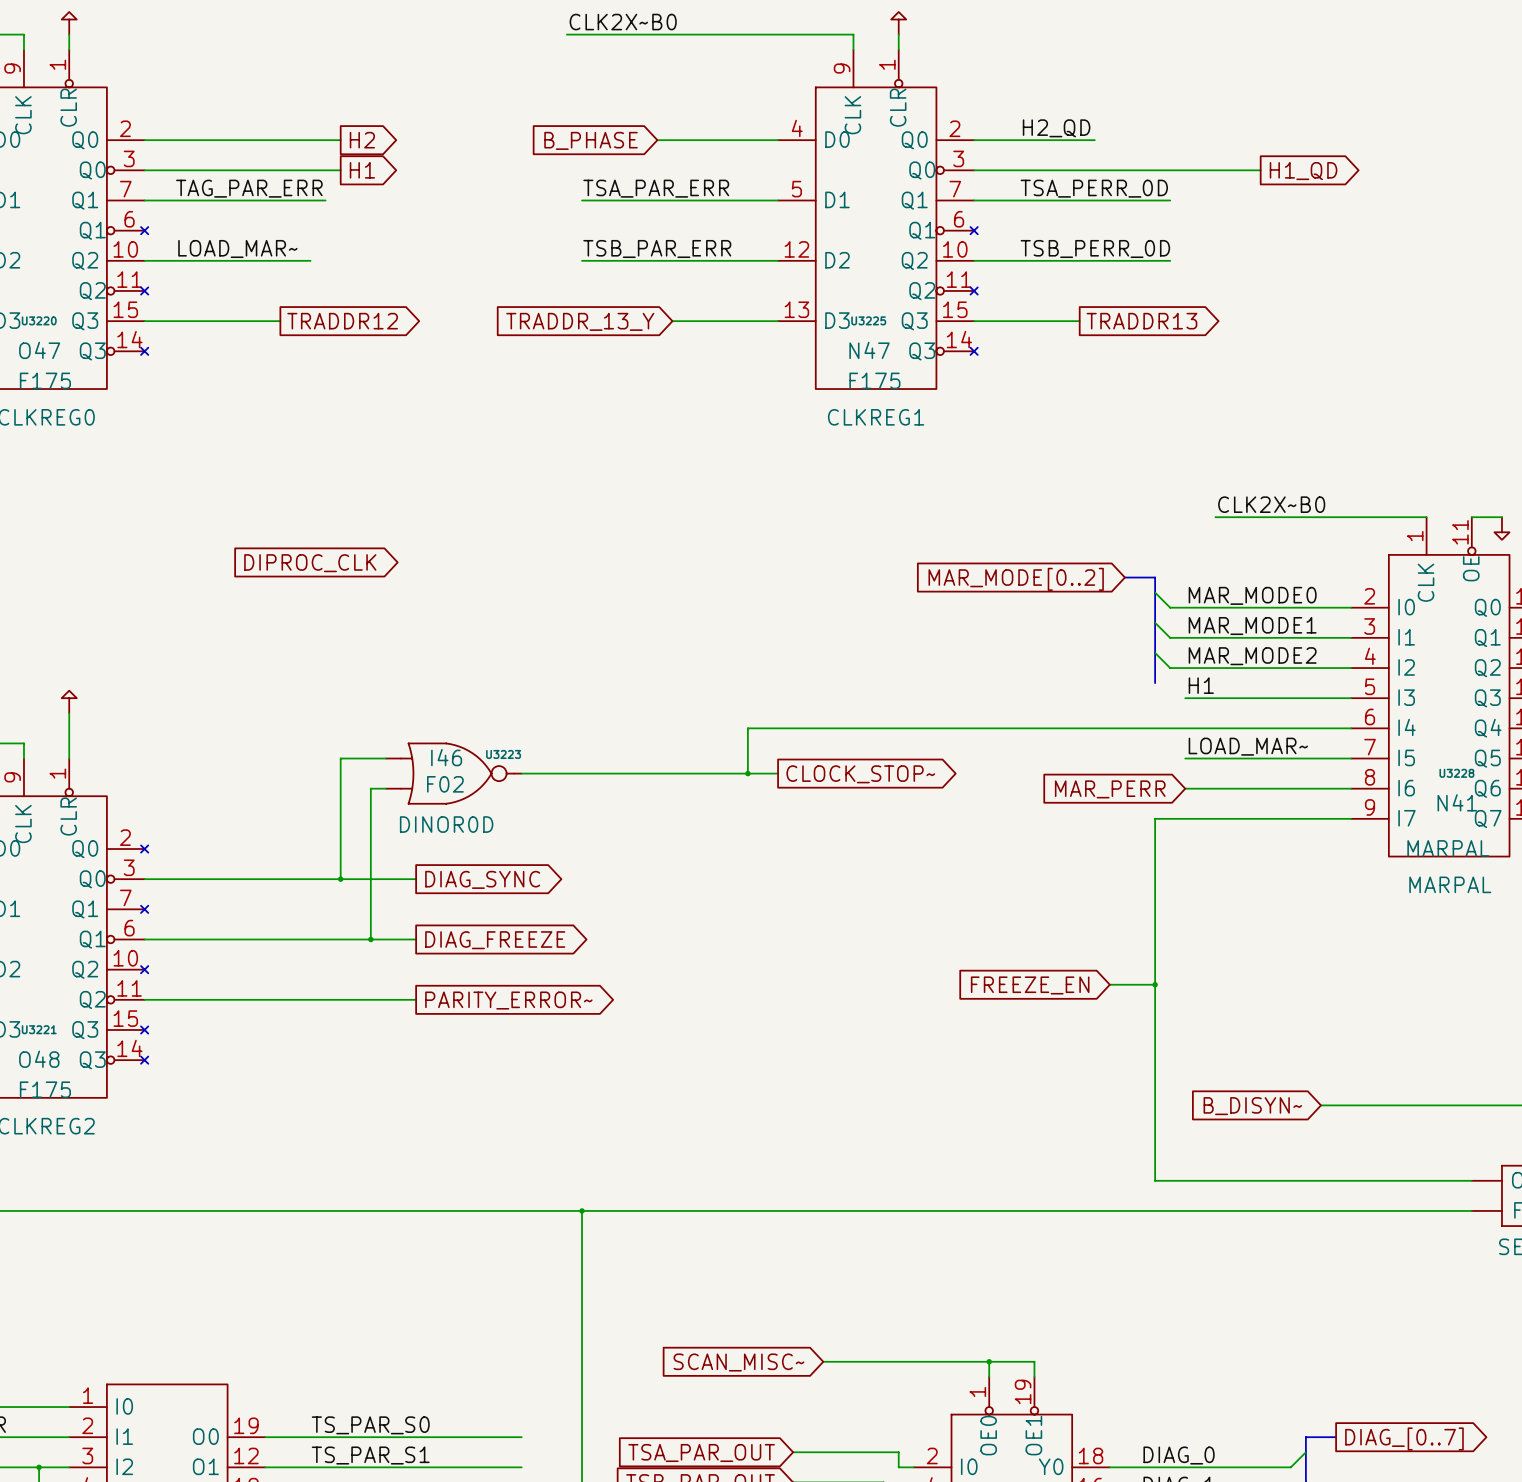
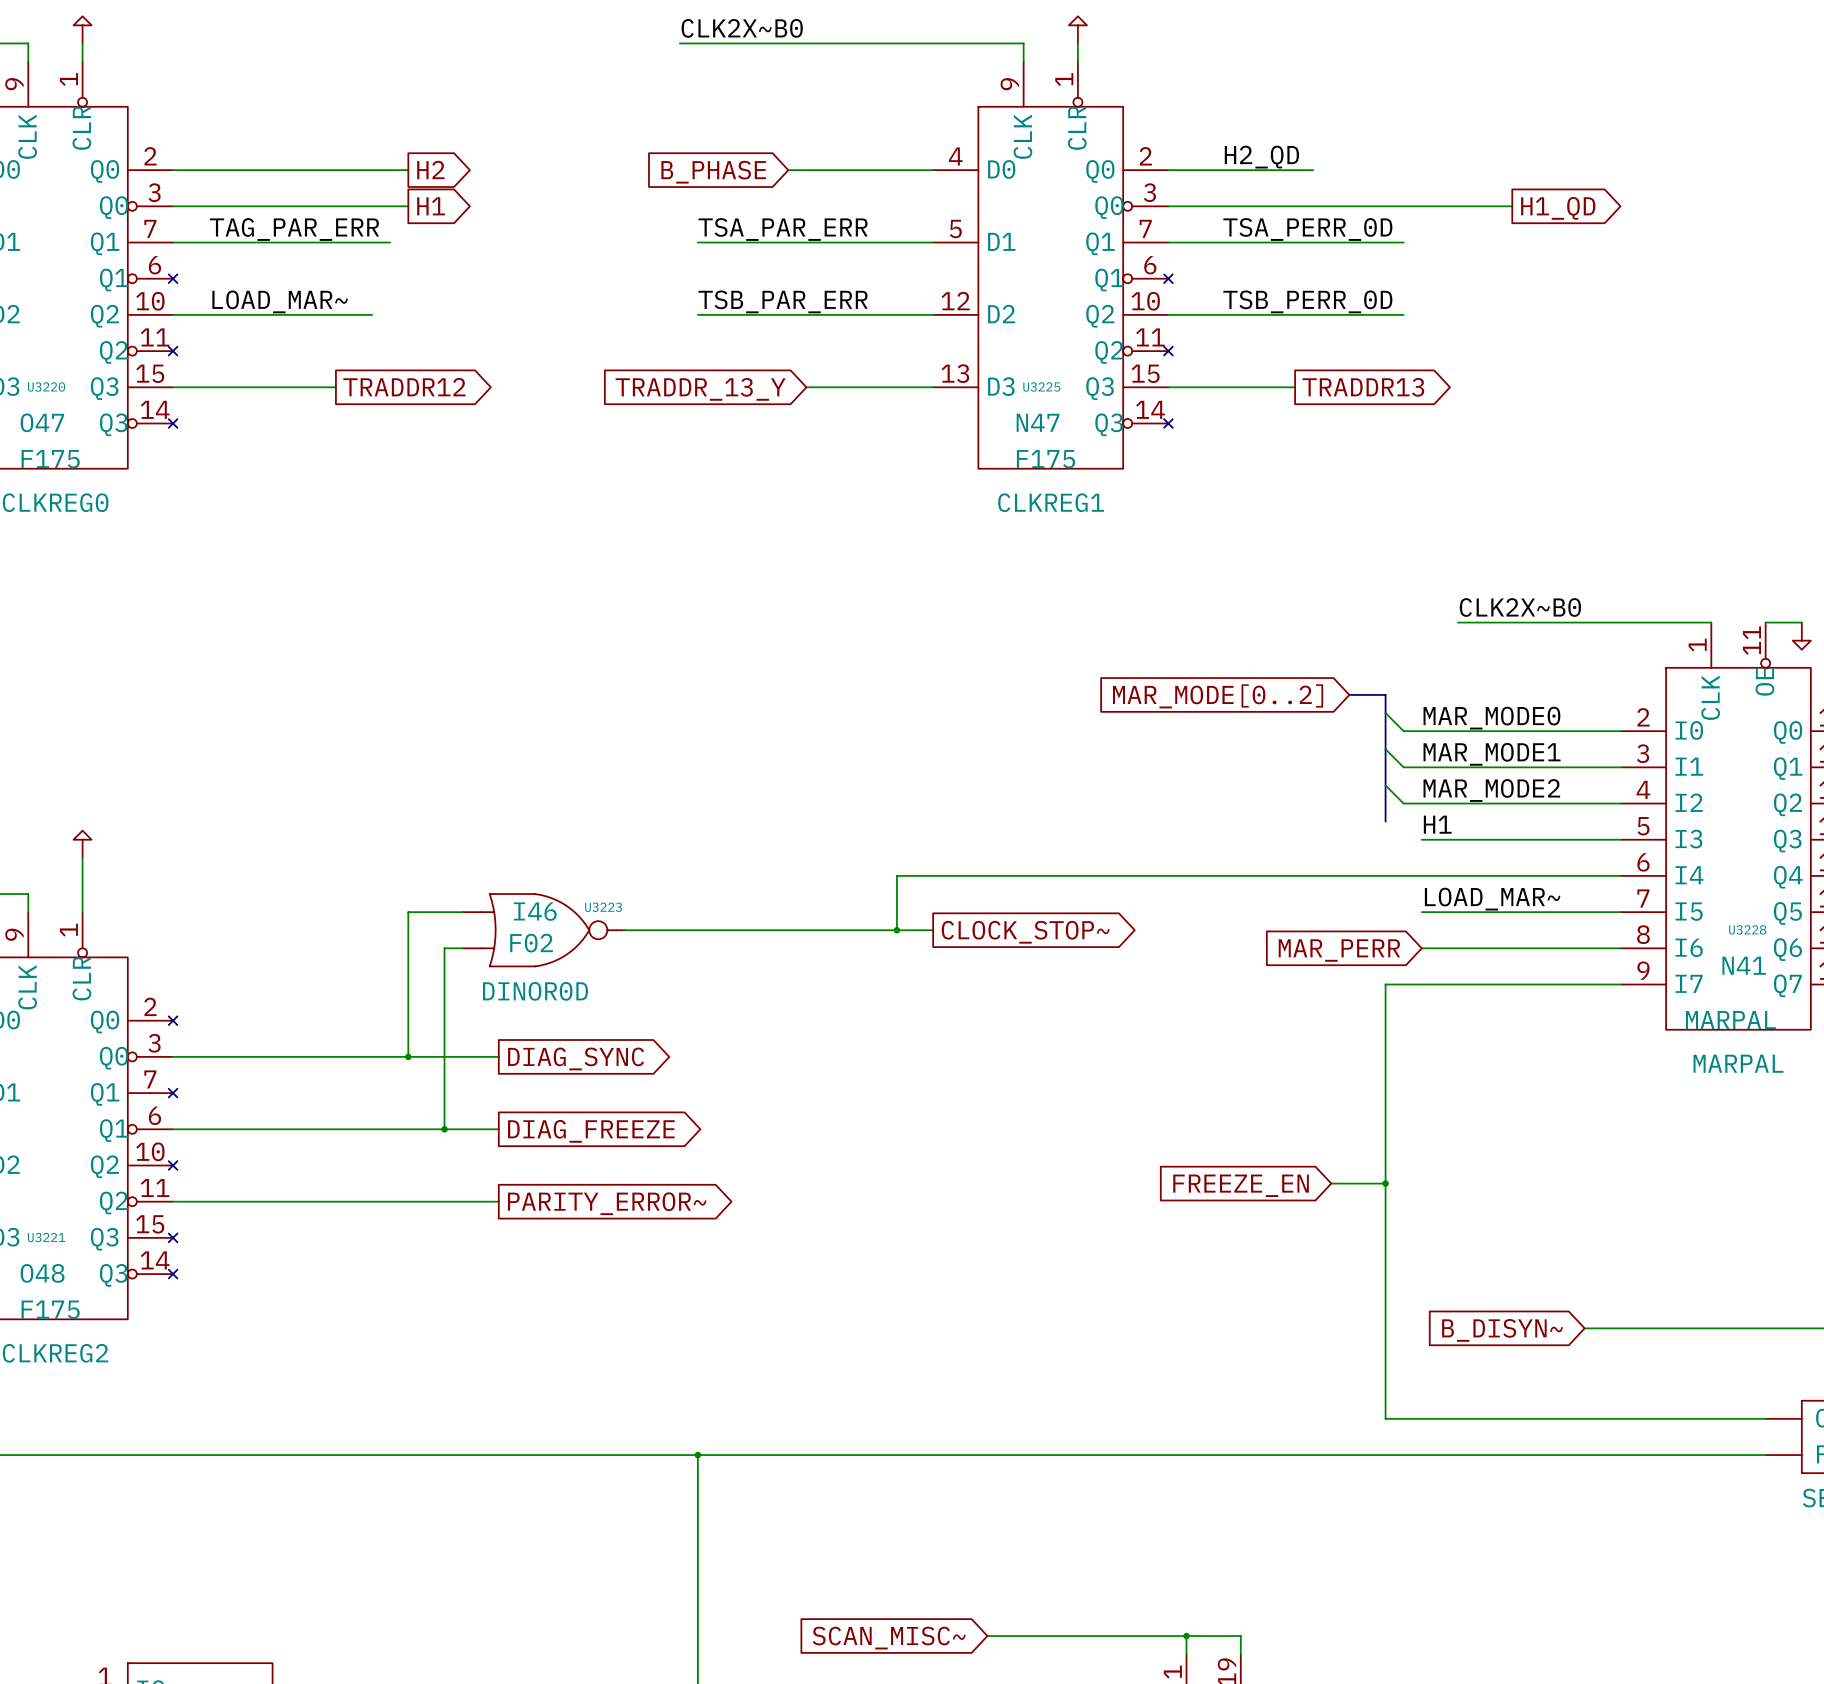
global label: DIPROC_CLK (310, 563) -> none

